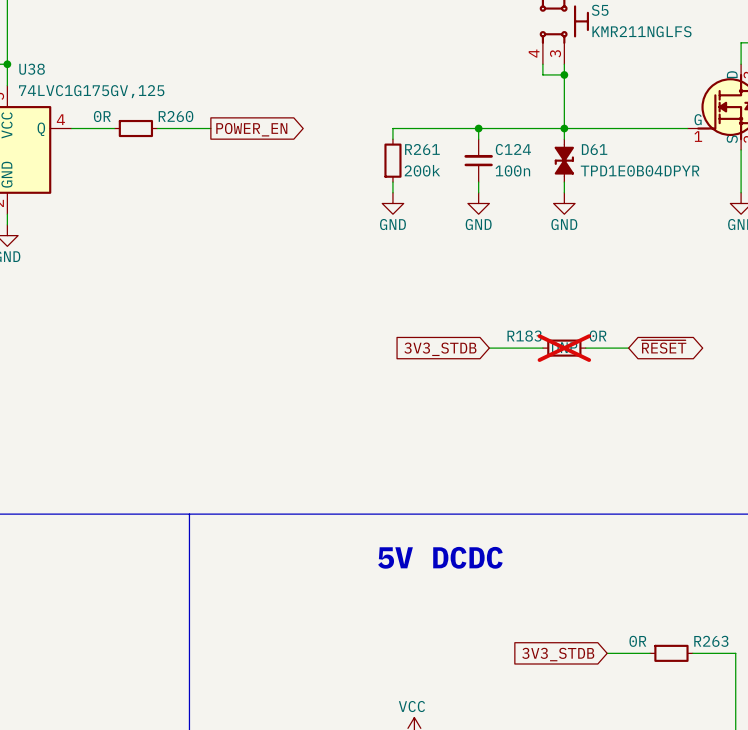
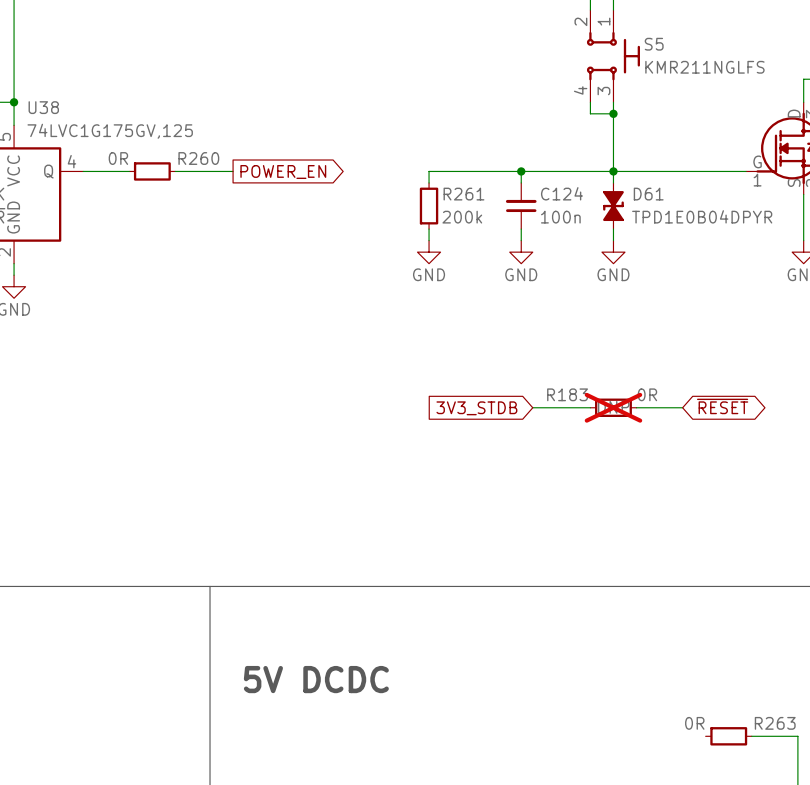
text position: 5V DCDC (440, 557) -> 5V DCDC (316, 679)
wire: (607, 653) (650, 653) -> none
global label: 3V3_STDB (558, 654) -> none

